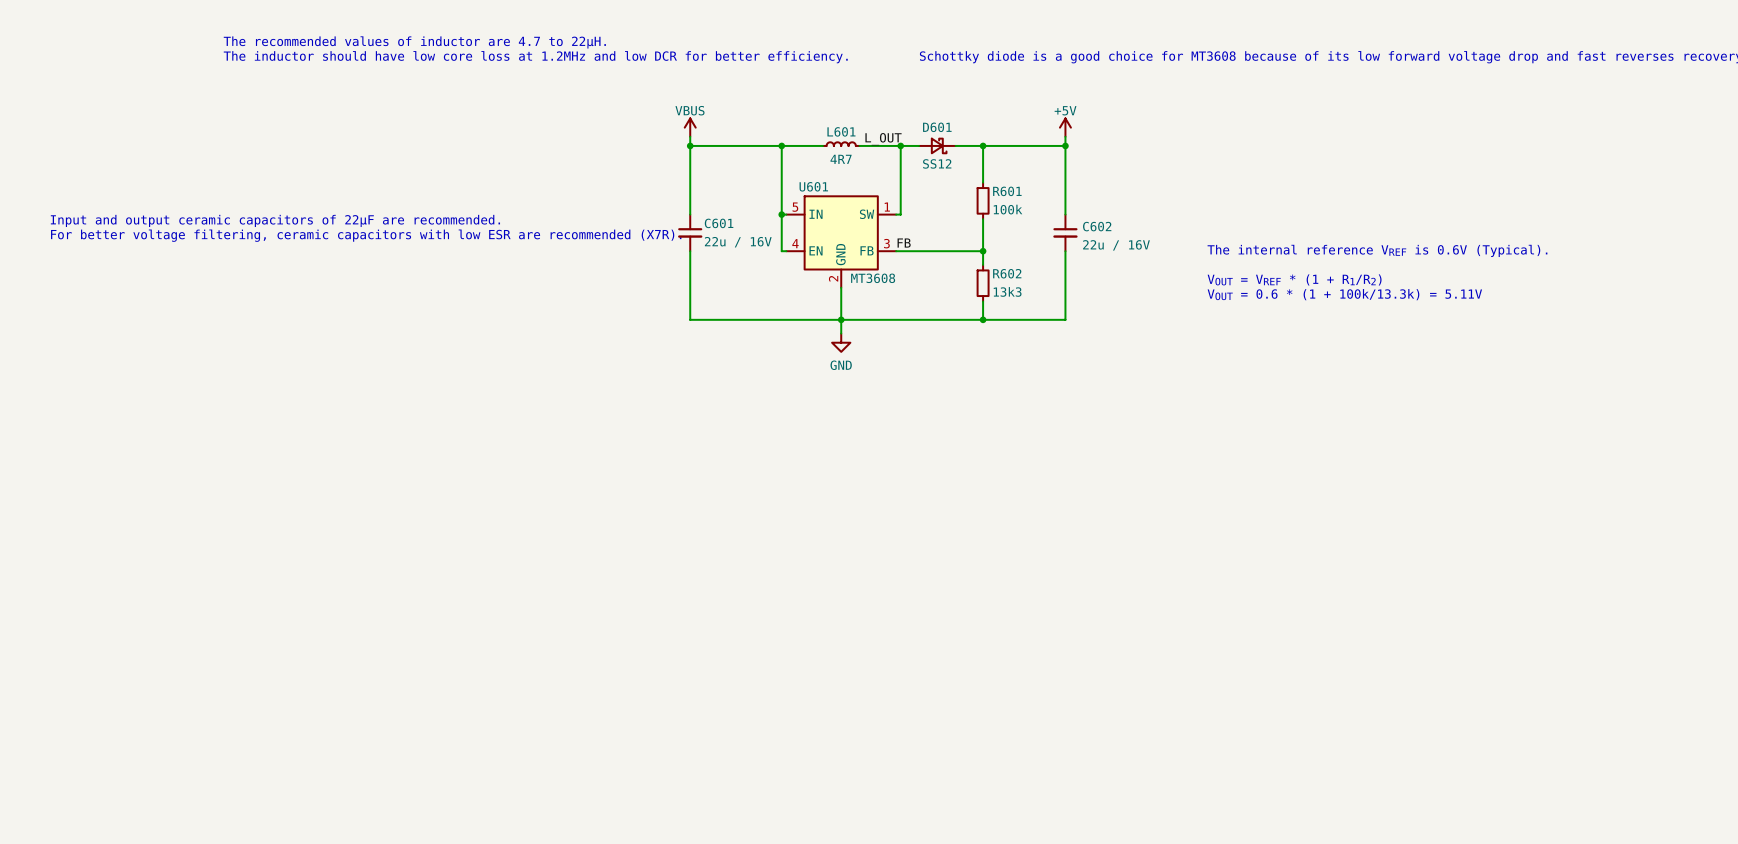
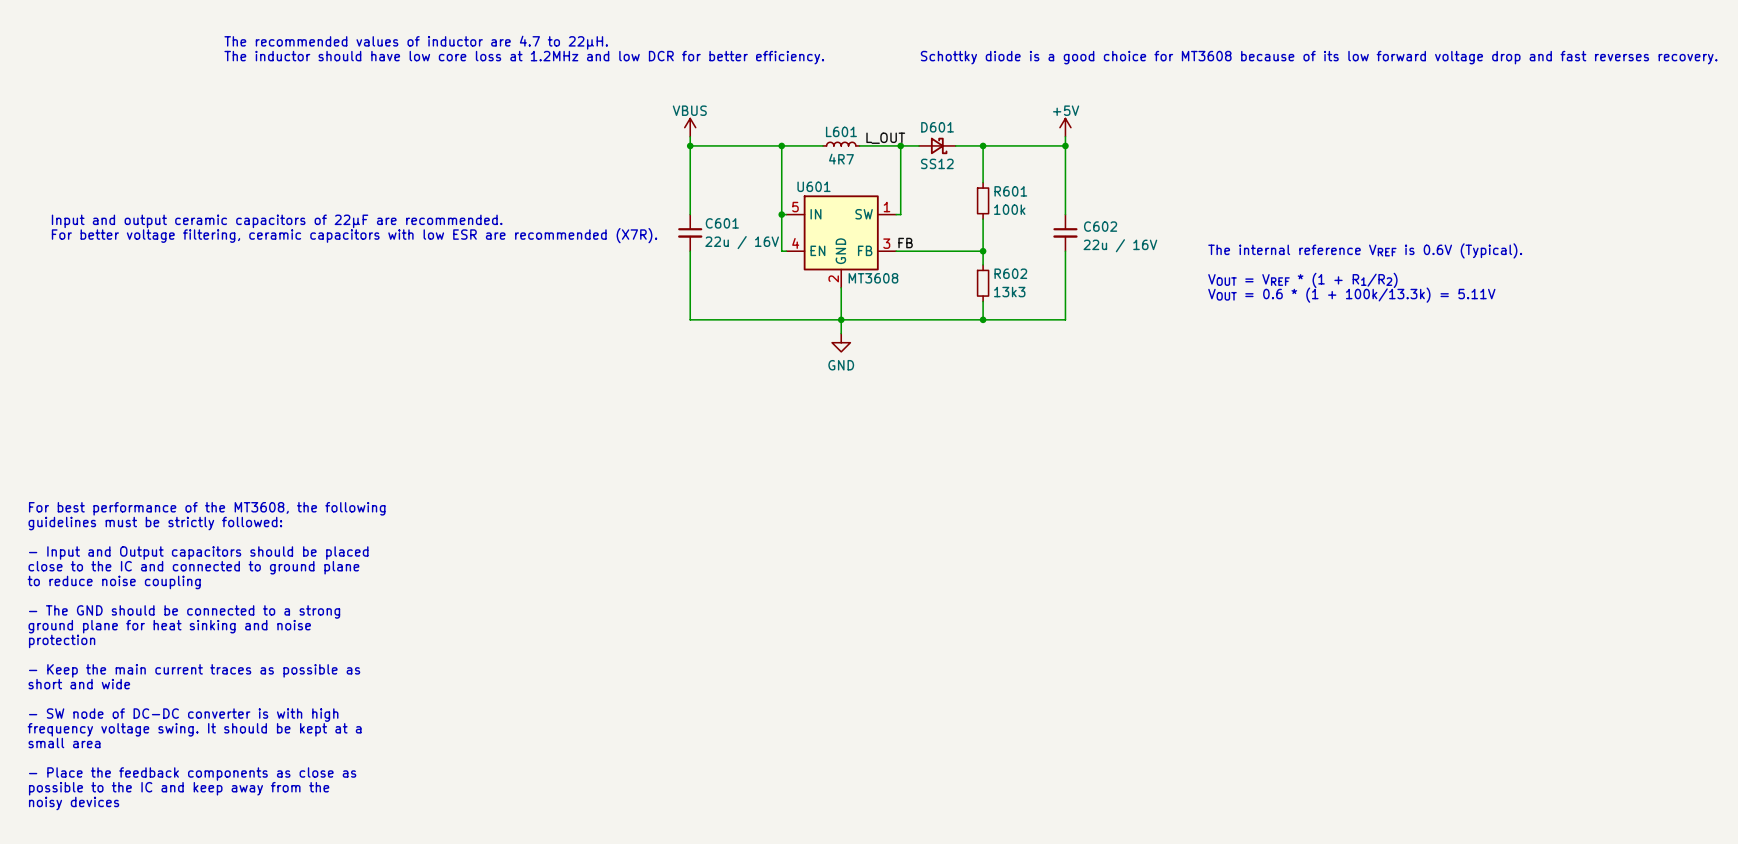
text: none -> For best performance of the MT3608, the following (207, 508)
text: none -> guidelines must be strictly followed: (155, 523)
text: none -> - Input and Output capacitors should be placed (198, 553)
text: none -> close to the IC and connected to ground plane (193, 567)
text: none -> to reduce noise coupling (114, 582)
text: none -> - The GND should be connected to a strong (184, 611)
text: none -> ground plane for heat sinking and noise (169, 626)
text: none -> protection (62, 641)
text: none -> - Keep the main current traces as possible as (194, 670)
text: none -> short and wide (79, 684)
text: none -> - SW node of DC-DC converter is with high (183, 715)
text: none -> frequency voltage swing. It should be kept at a (194, 729)
text: none -> small area (64, 743)
text: none -> - Place the feedback components as close as (192, 774)
text: none -> possible to the IC and keep away from the (179, 788)
text: none -> noisy devices (74, 803)

